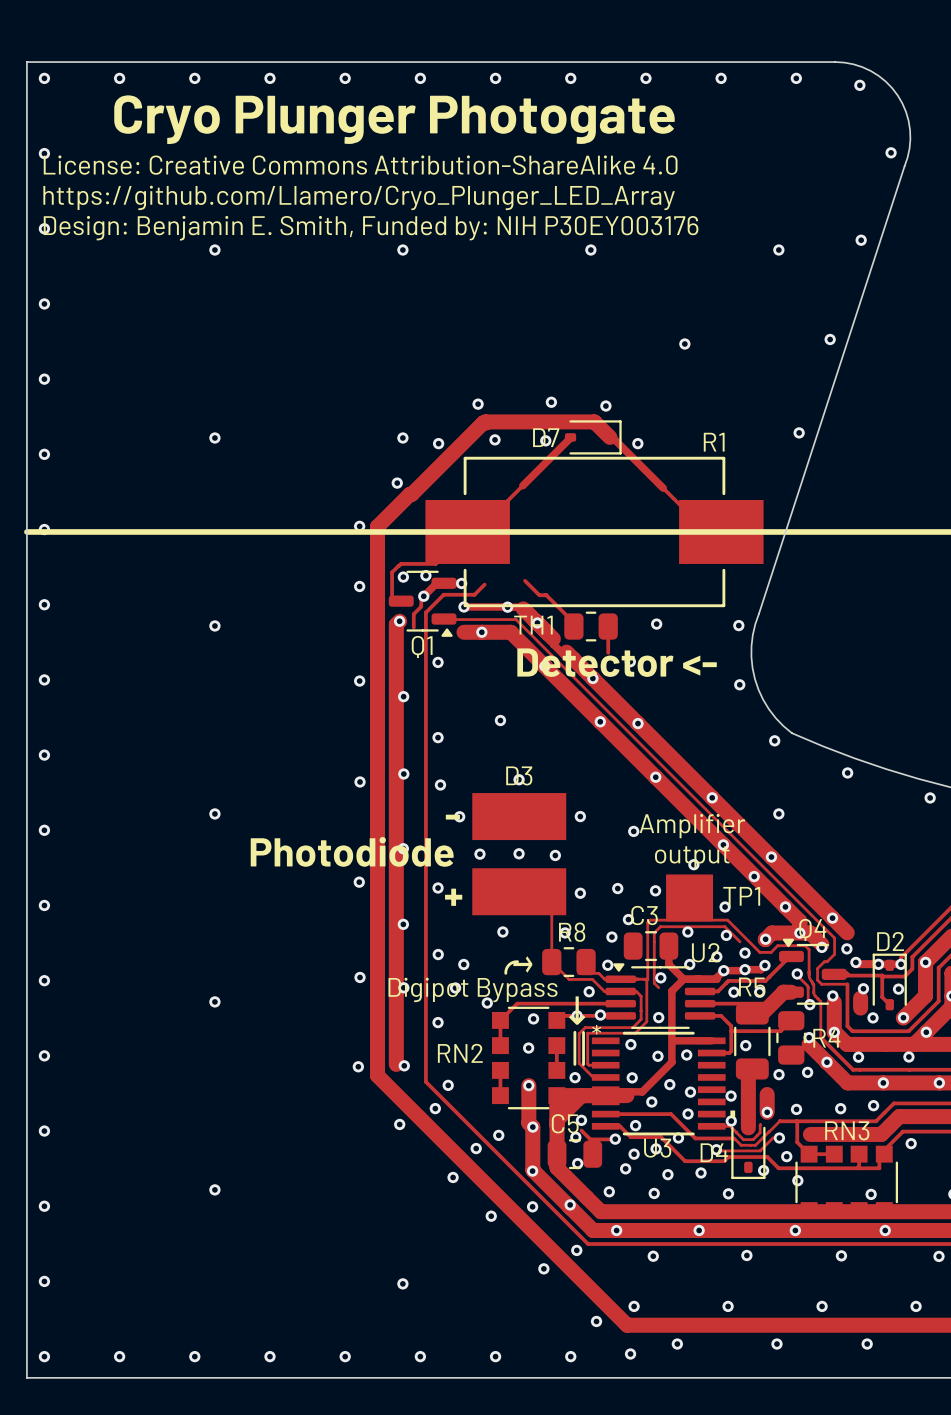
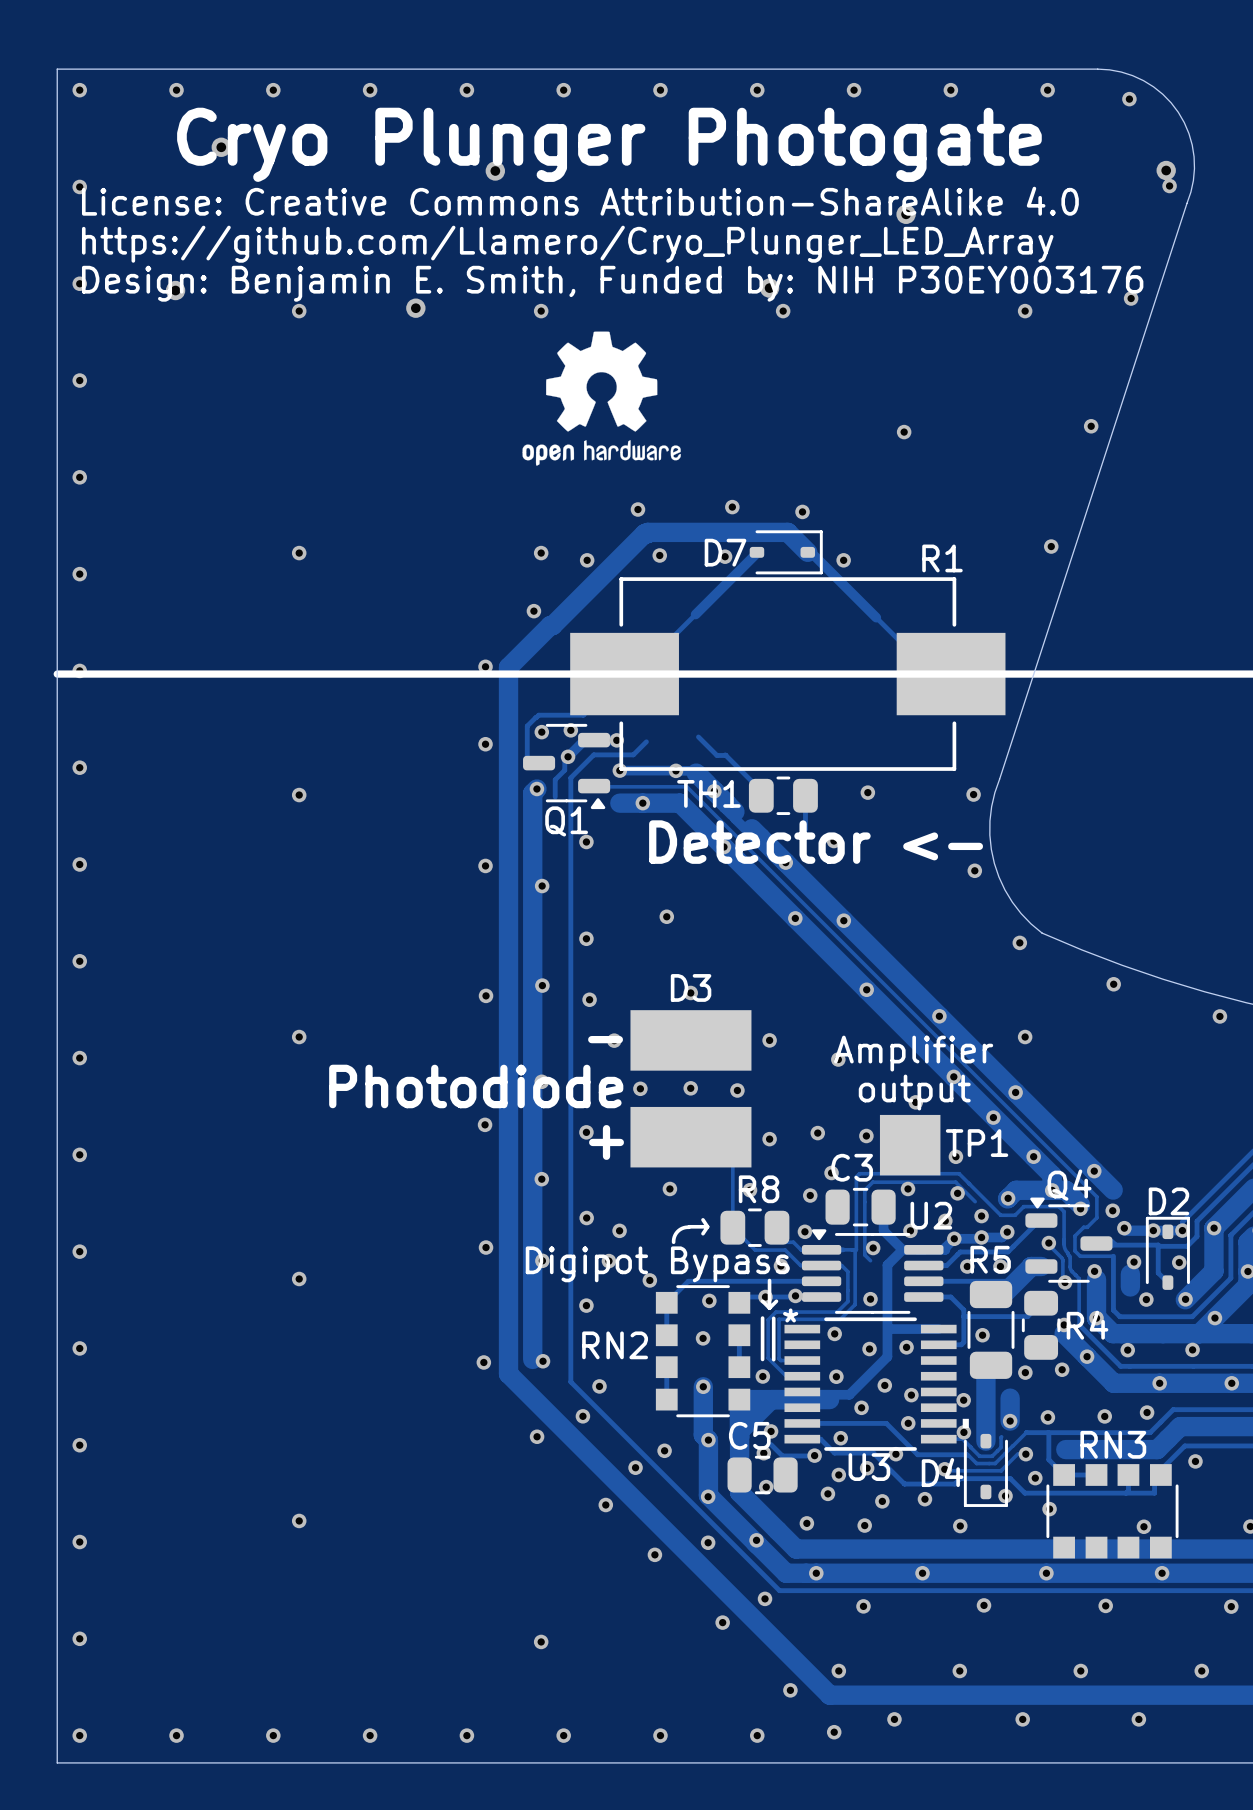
via: none -> (221, 147)
via: none -> (1166, 170)
via: none -> (495, 170)
via: none -> (906, 214)
via: none -> (769, 288)
via: none -> (175, 290)
via: none -> (415, 308)
drawing: none -> [522, 331, 681, 466]

